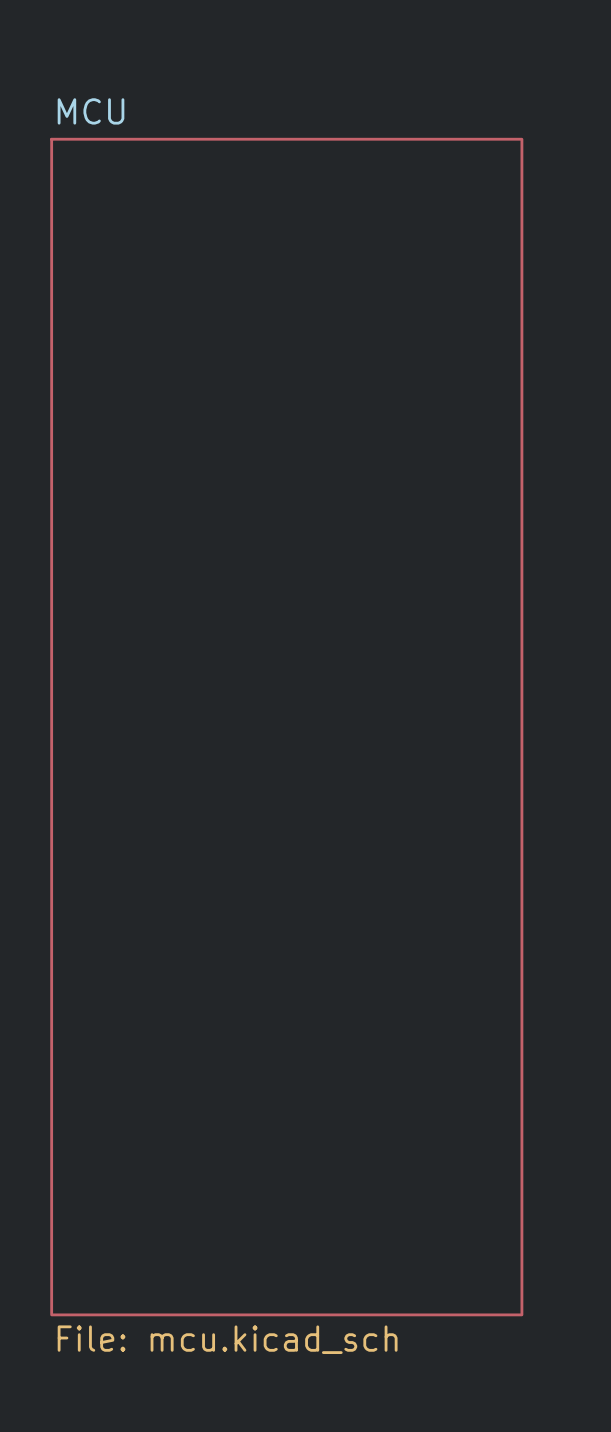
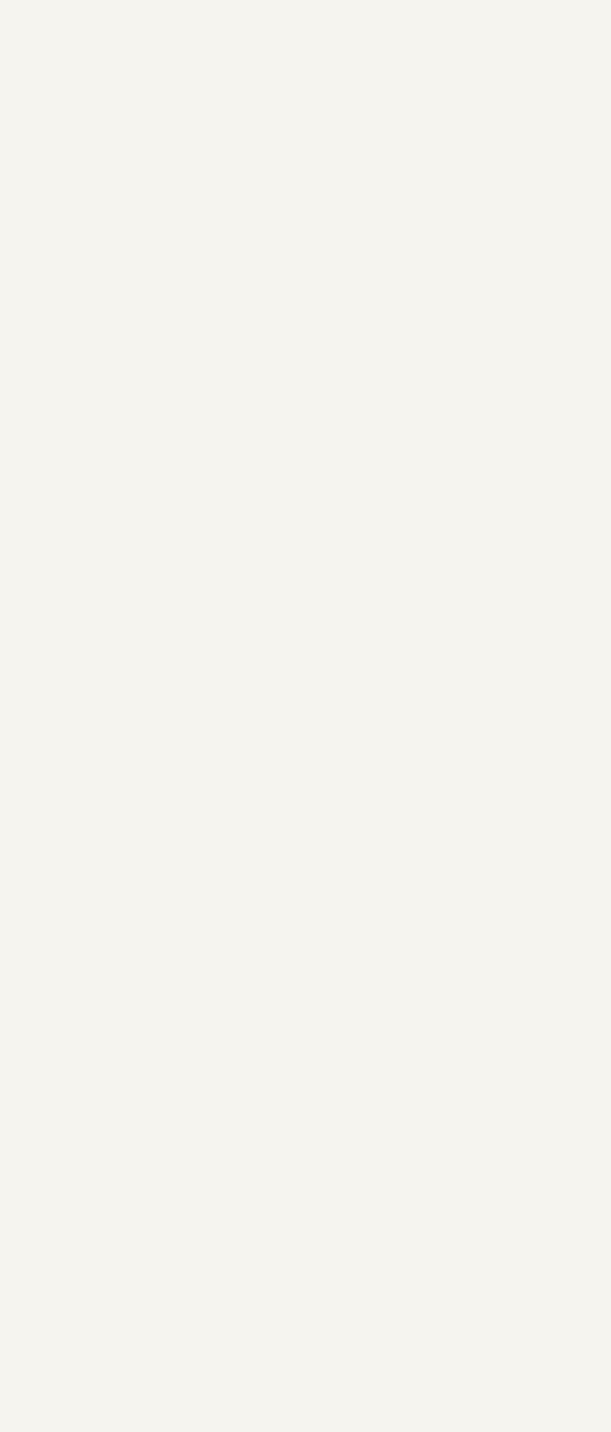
sheet MCU: File: mcu.kicad_sch (286, 727) -> none

